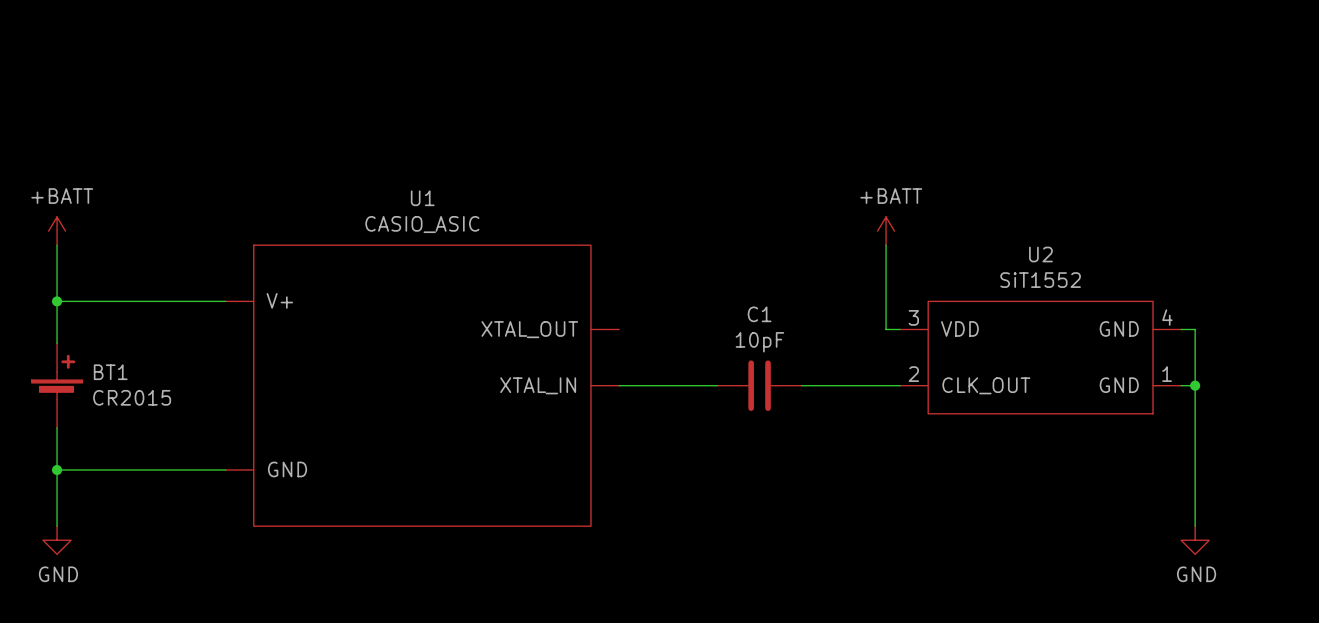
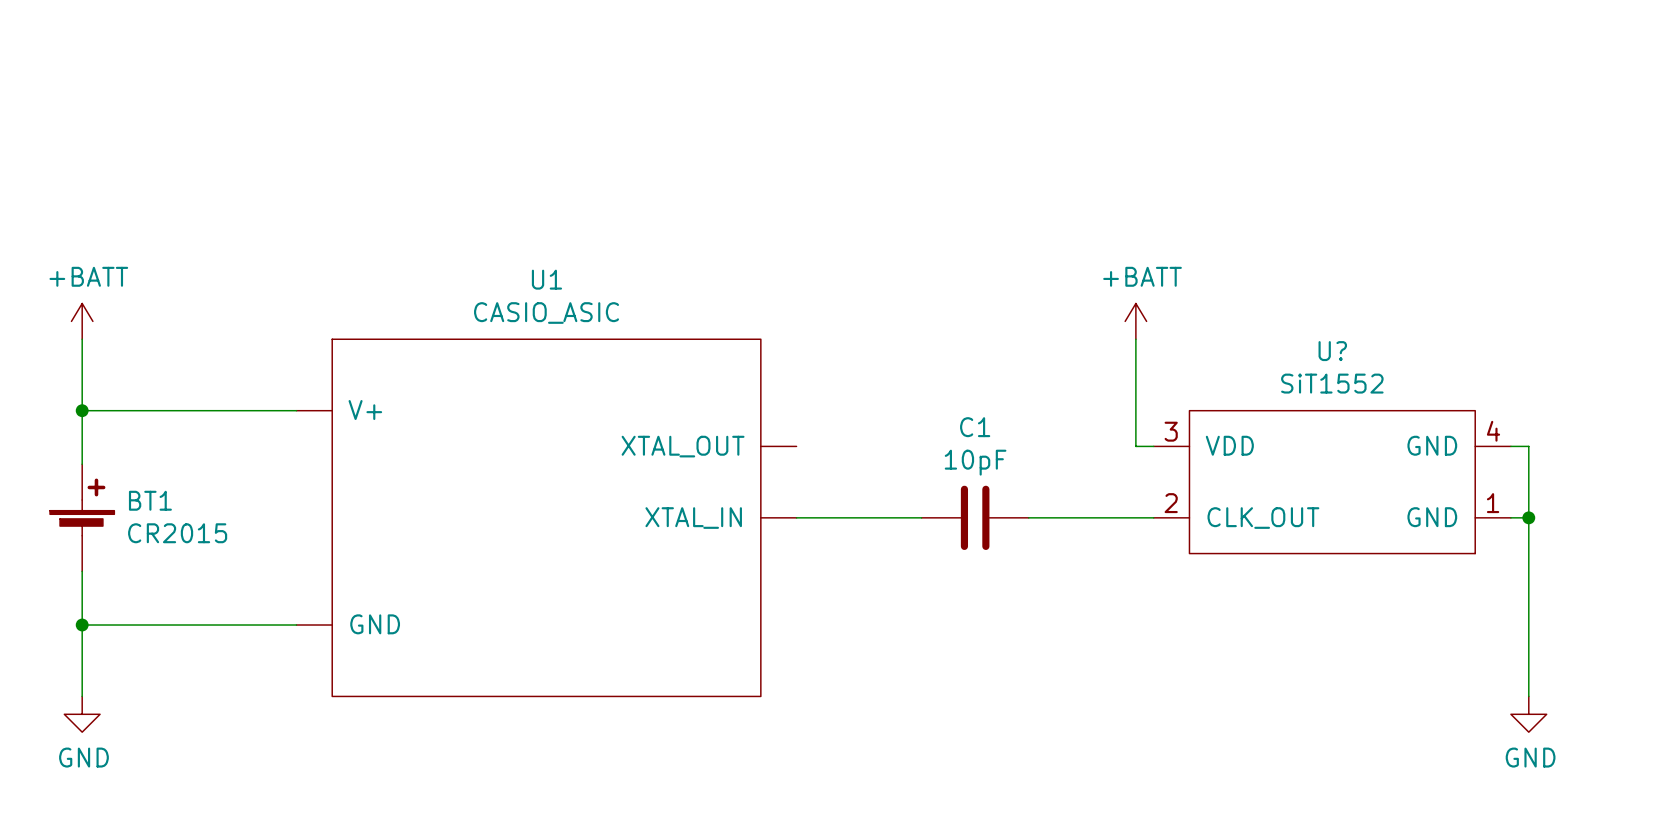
U2 name: U2 (1040, 254) -> U? (1332, 351)

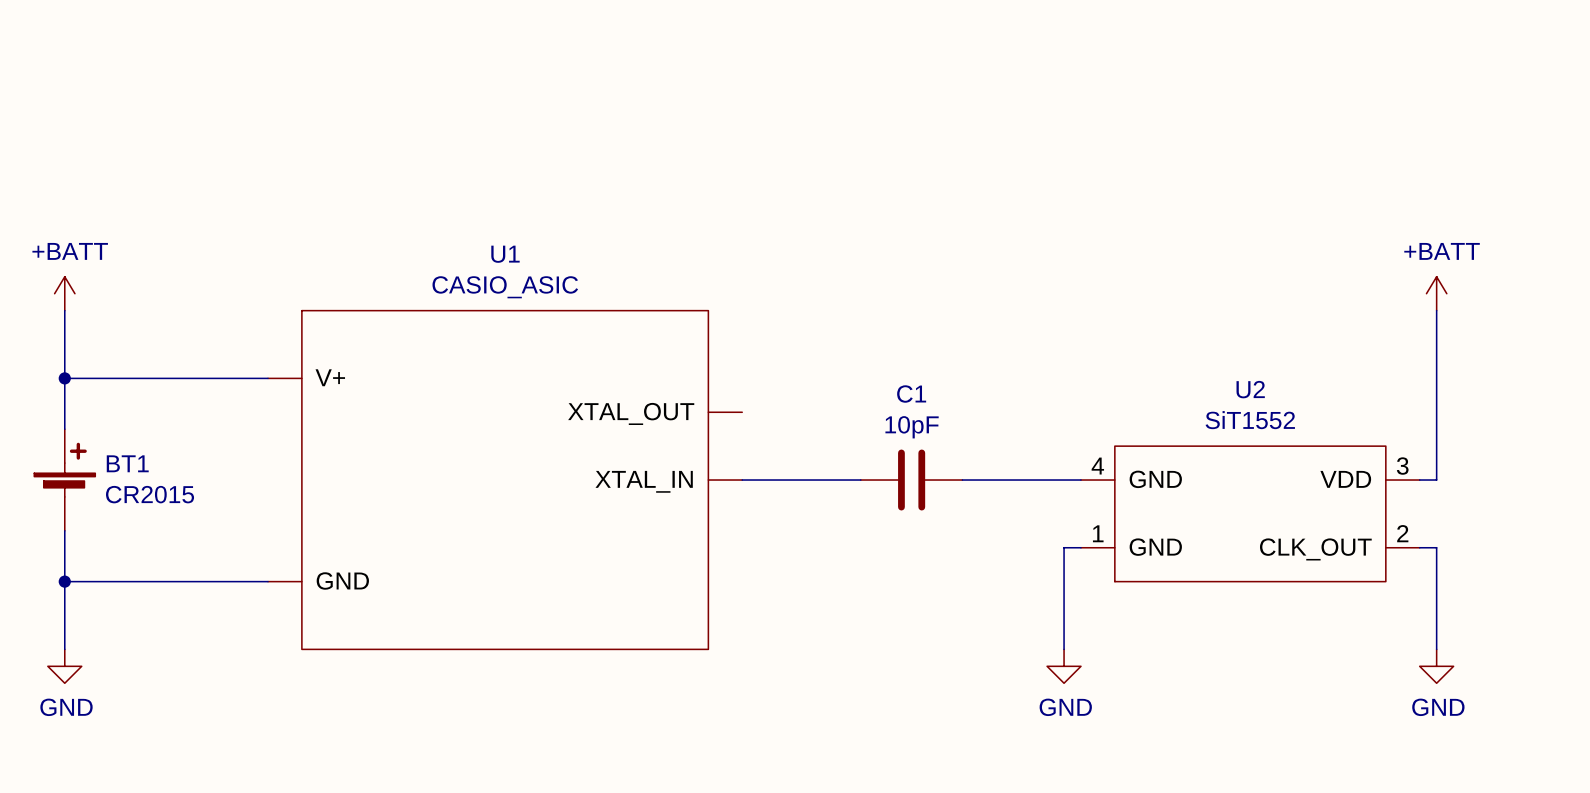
power symbol: +BATT (1135, 321) -> none
power symbol: none -> +BATT (1436, 293)
wire: (1135, 339) (1135, 446) (1153, 446) -> none
wire: (1510, 446) (1528, 446) -> (1436, 310) (1436, 412)
U?: SiT1552 (1332, 482) -> none
wire: (1528, 517) (1528, 589) -> (1419, 547) (1436, 547)
junction: (1528, 517) -> none
U2: none -> SiT1552 (1250, 513)
wire: none -> (1080, 547) (1064, 547) (1064, 649)
power symbol: none -> GND (1064, 666)

